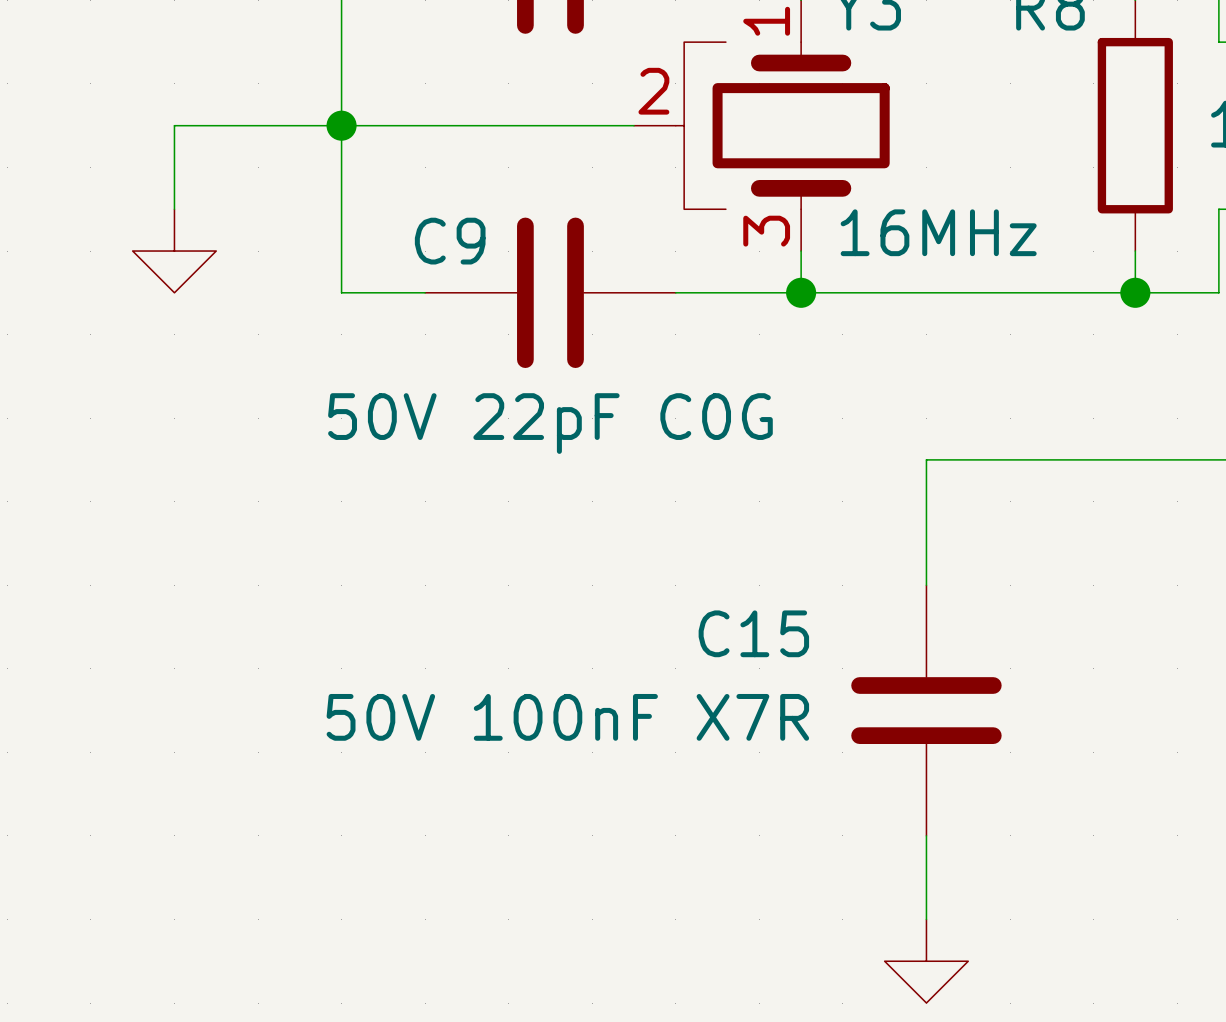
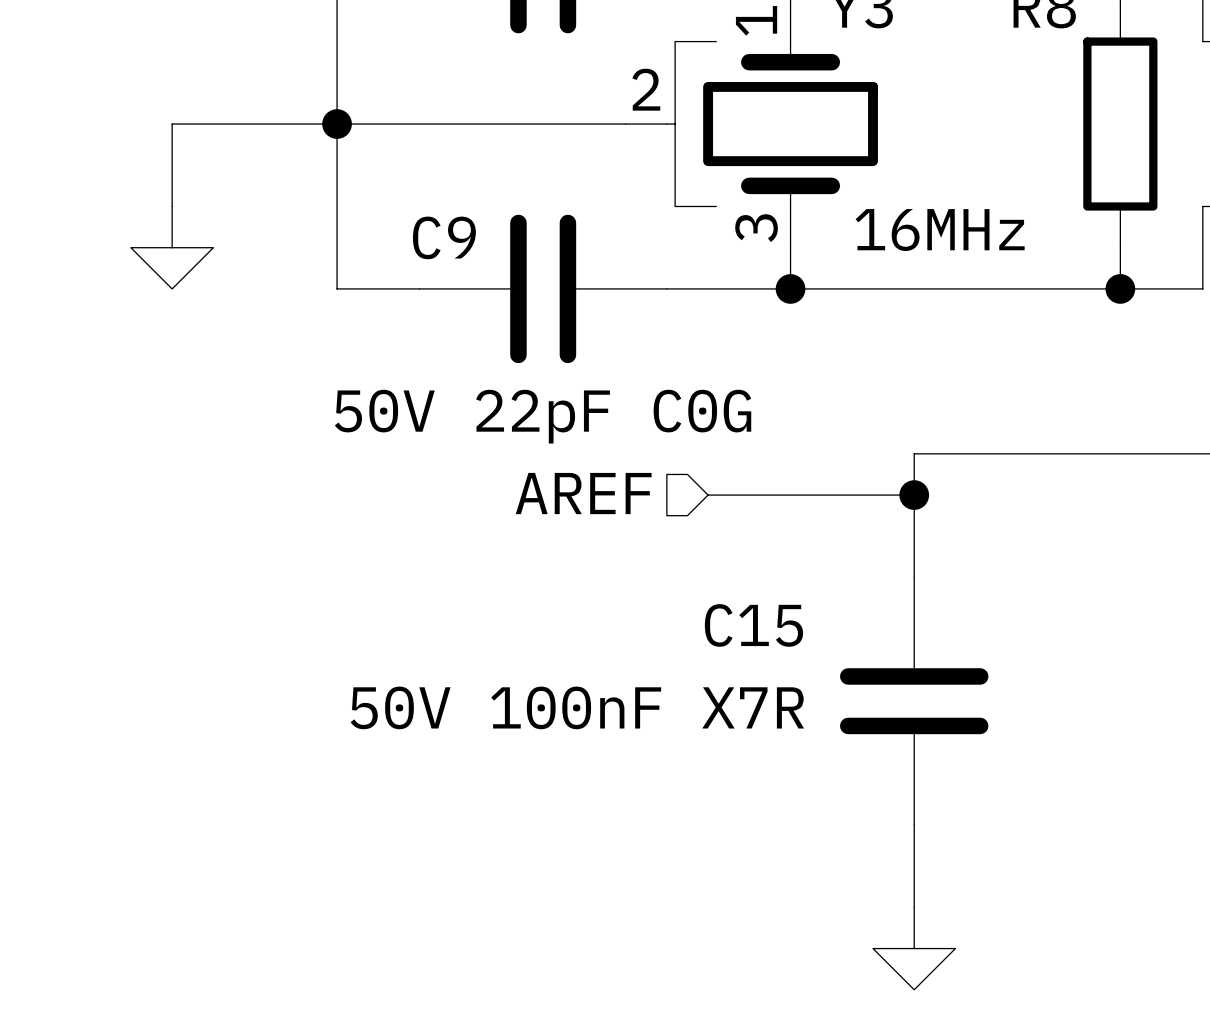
hierarchical label: none -> AREF (583, 493)
wire: none -> (708, 495) (914, 495)
junction: none -> (914, 495)

